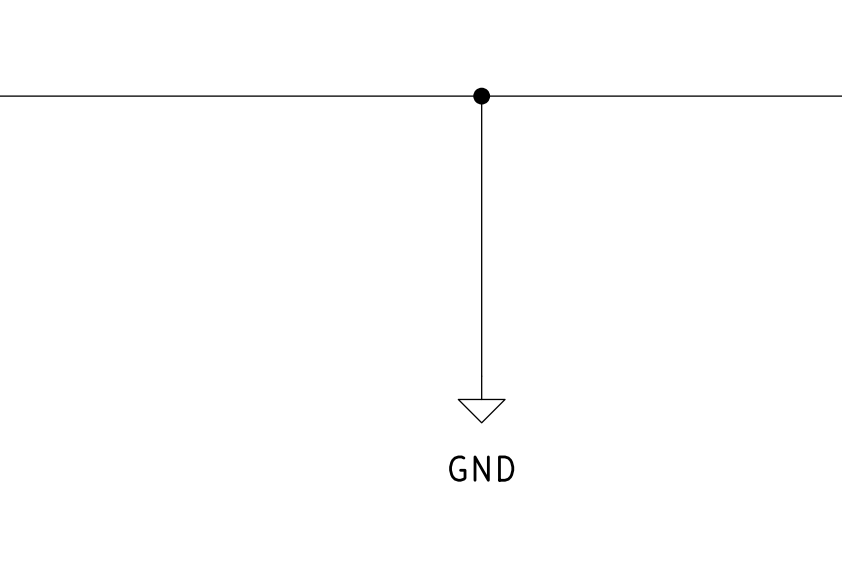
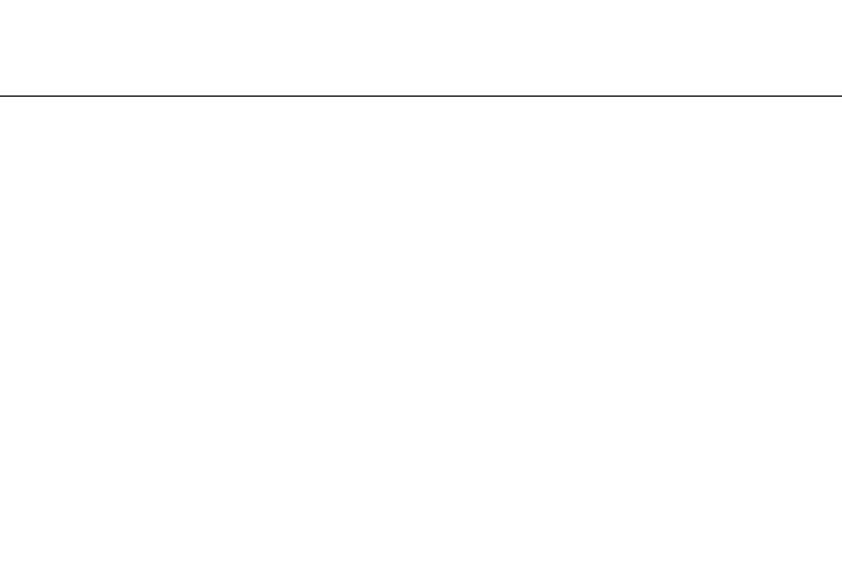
wire: (481, 96) (481, 376) -> none
junction: (481, 96) -> none
power symbol: GND (481, 399) -> none

